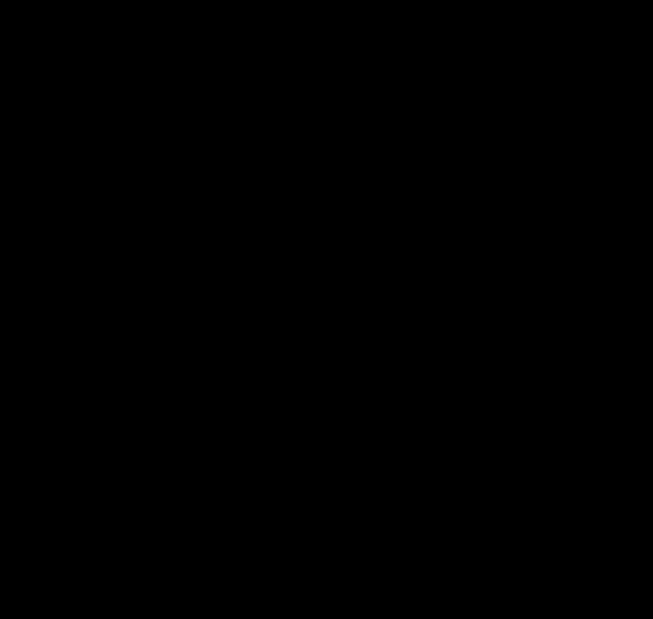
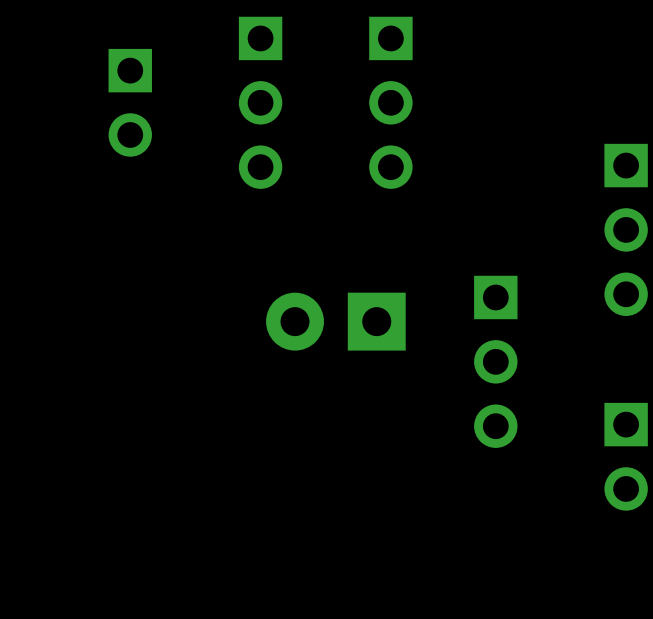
part: none -> (130, 102)
part: none -> (260, 102)
part: none -> (390, 102)
part: none -> (626, 229)
part: none -> (335, 321)
part: none -> (495, 361)
part: none -> (626, 456)

